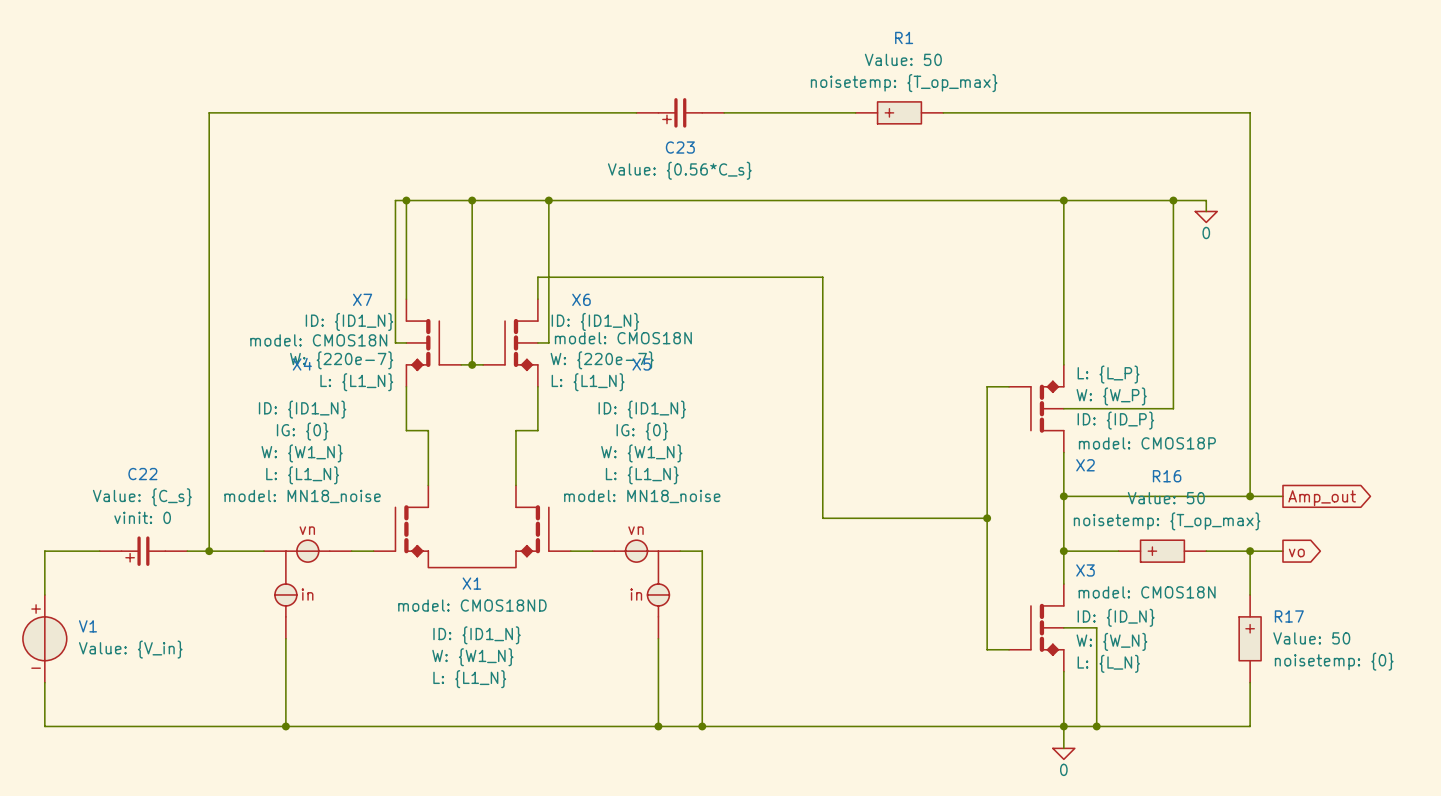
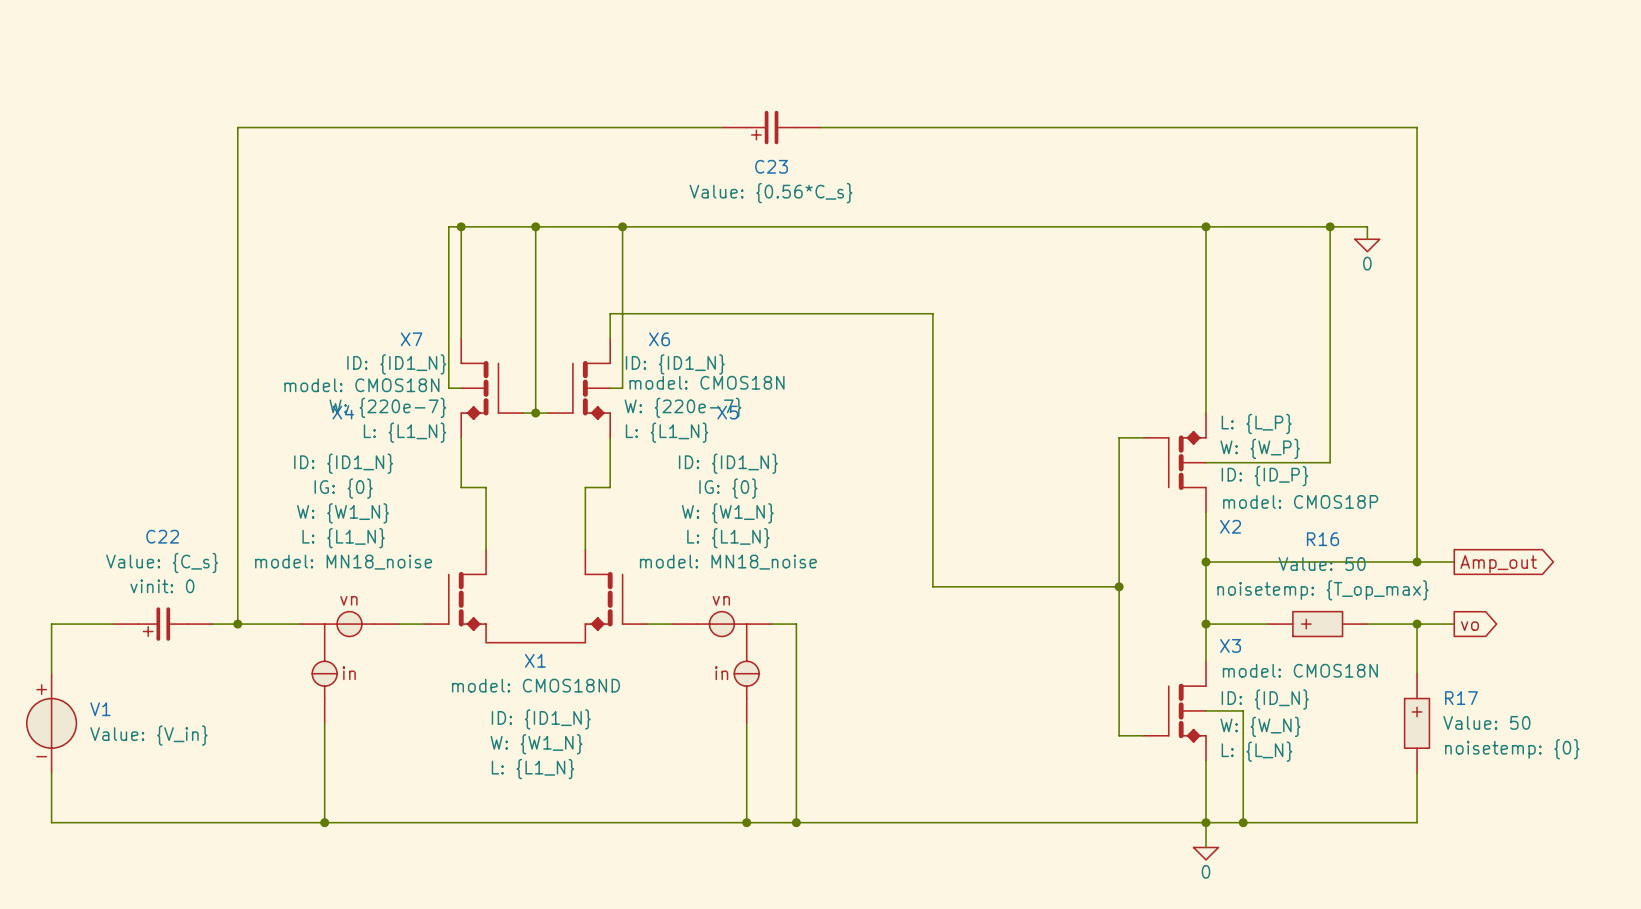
R1: Value: 50 (899, 112) -> none

